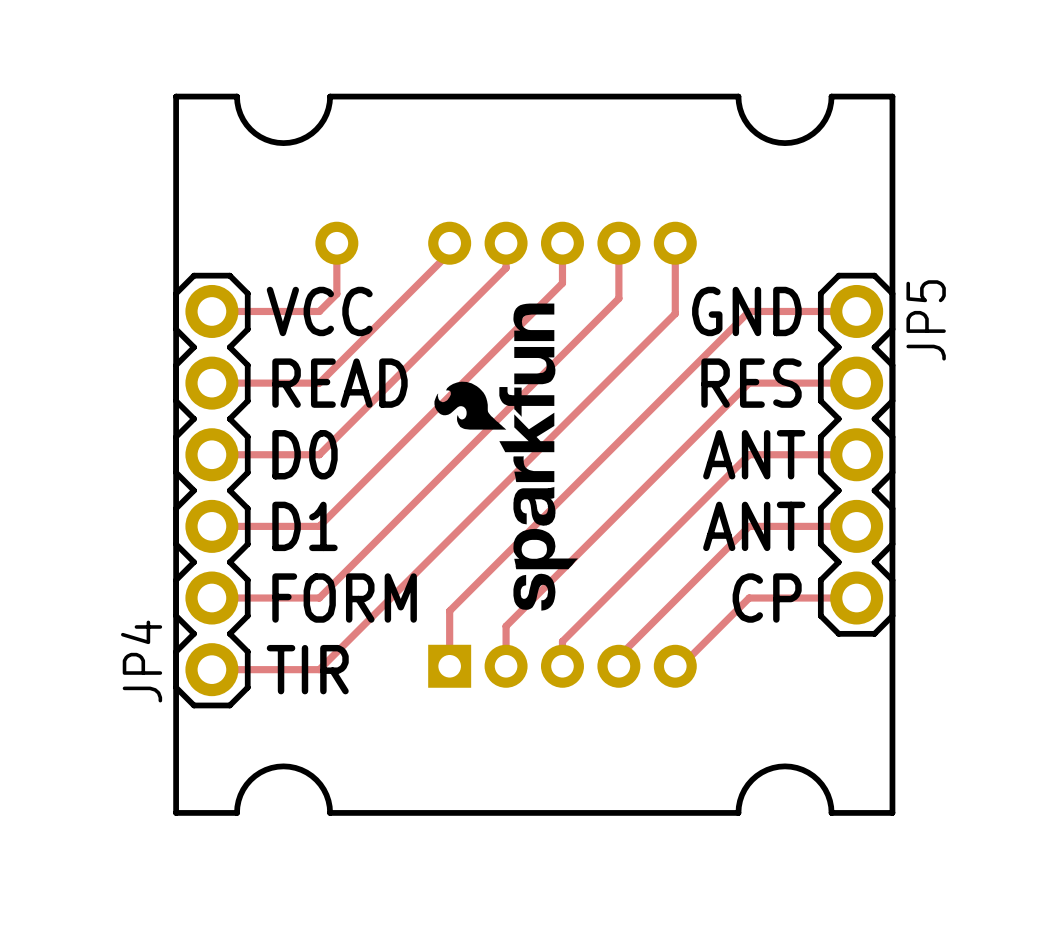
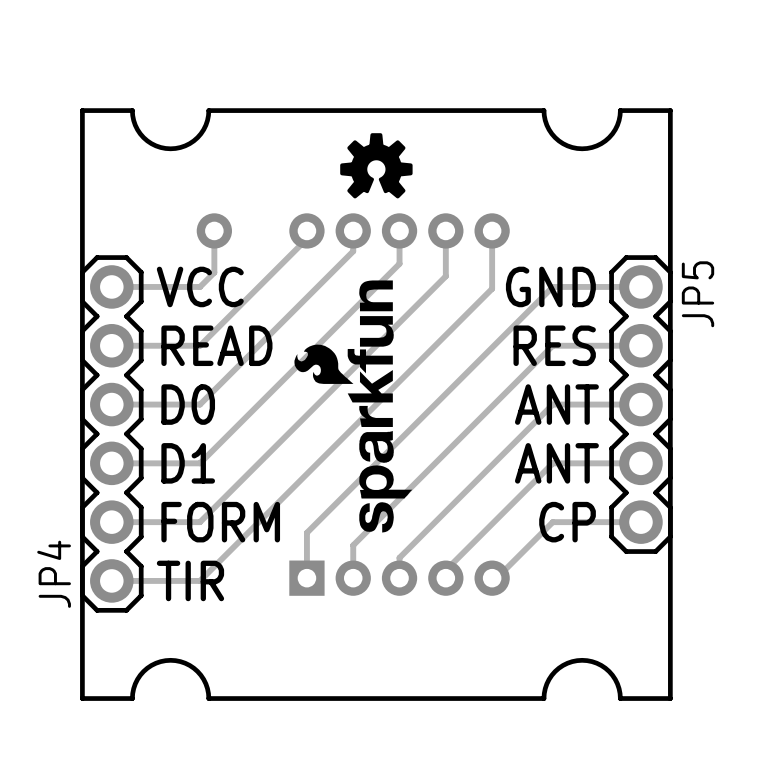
drawing: none -> [340, 133, 413, 199]

